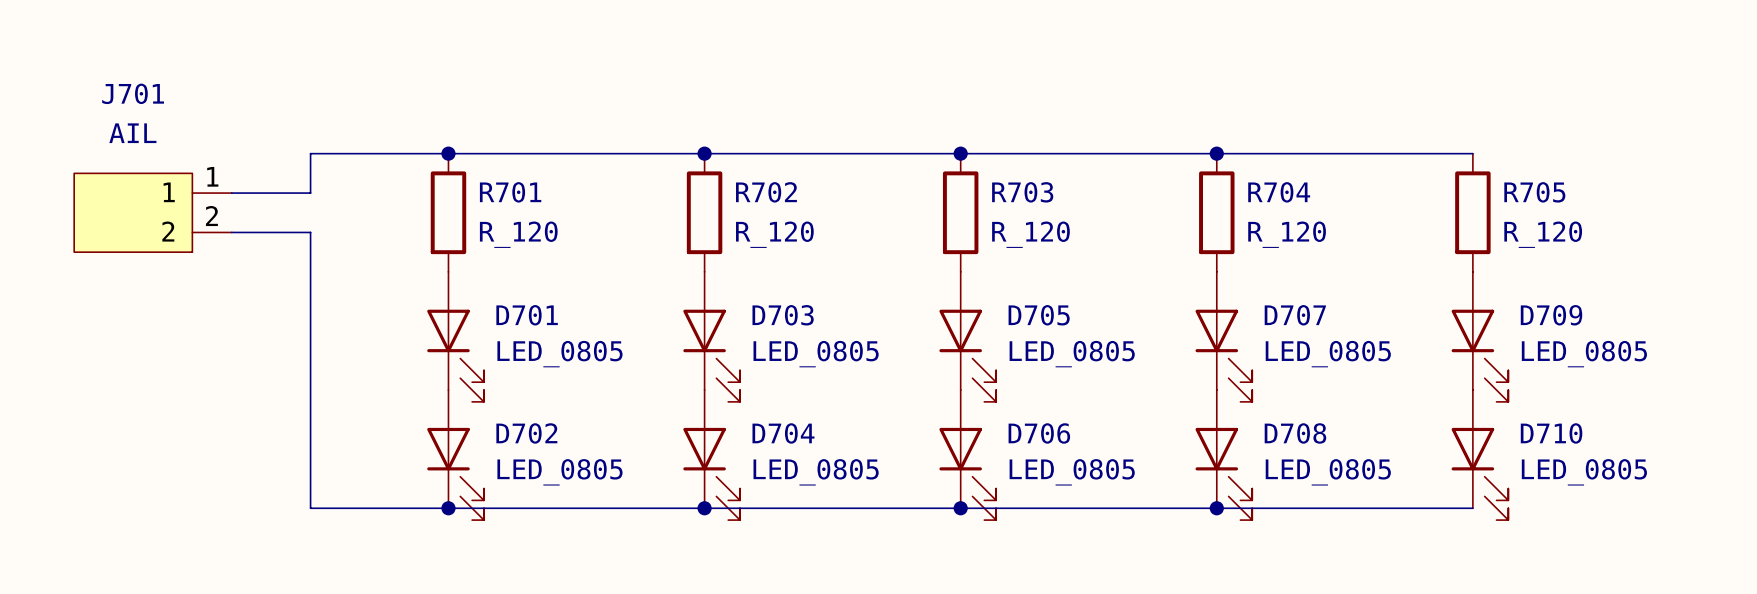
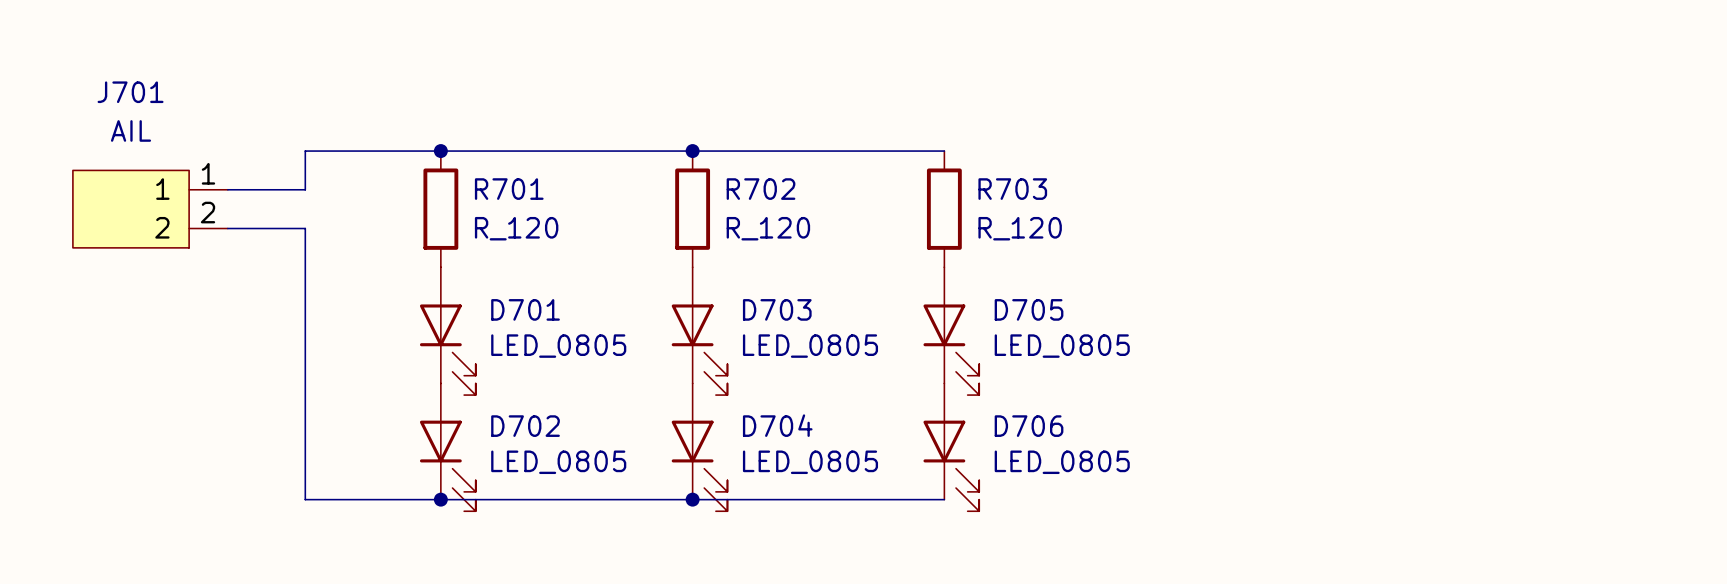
wire: (960, 153) (1472, 153) -> none
junction: (960, 153) -> none
junction: (1216, 153) -> none
R704: R_120 (1216, 212) -> none
R705: R_120 (1472, 212) -> none
D707: LED_0805 (1223, 336) -> none
D709: LED_0805 (1479, 336) -> none
D708: LED_0805 (1223, 455) -> none
D710: LED_0805 (1479, 455) -> none
wire: (960, 508) (1472, 508) -> none
junction: (960, 508) -> none
junction: (1216, 508) -> none

